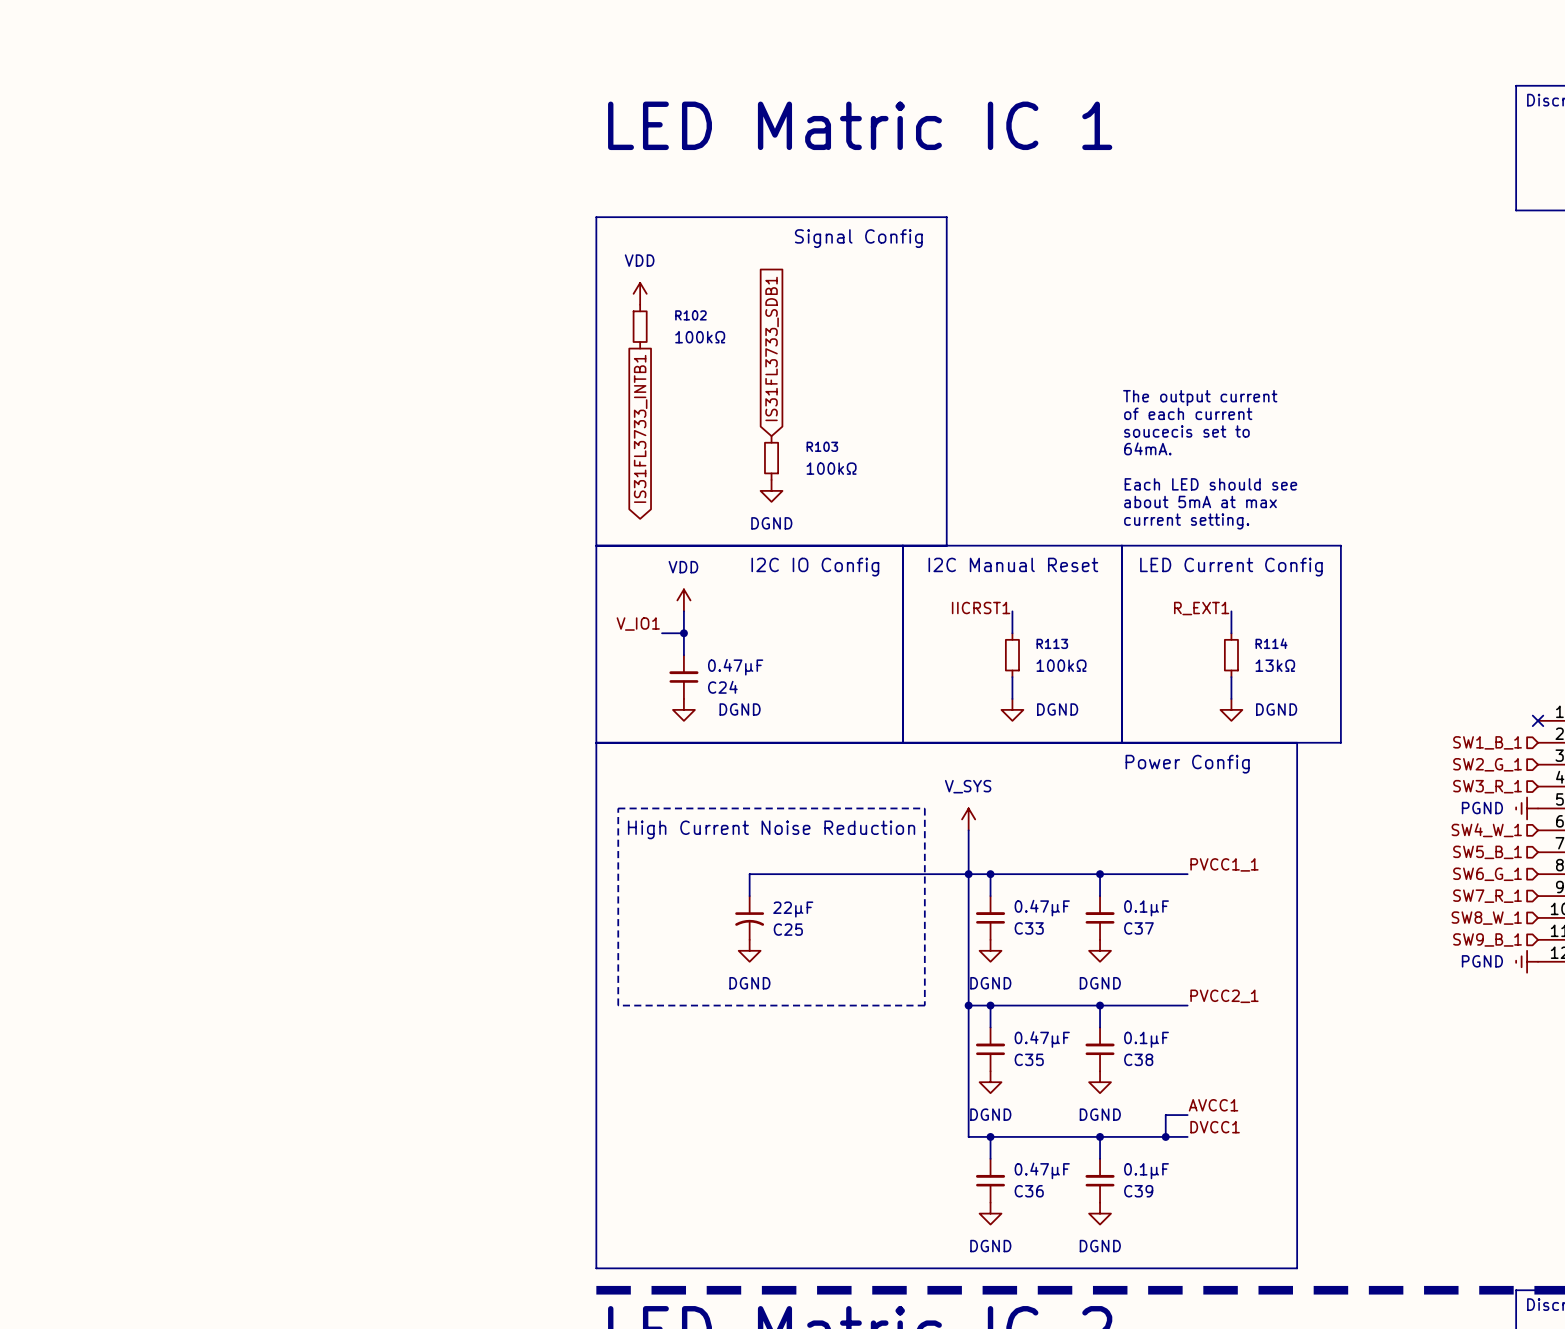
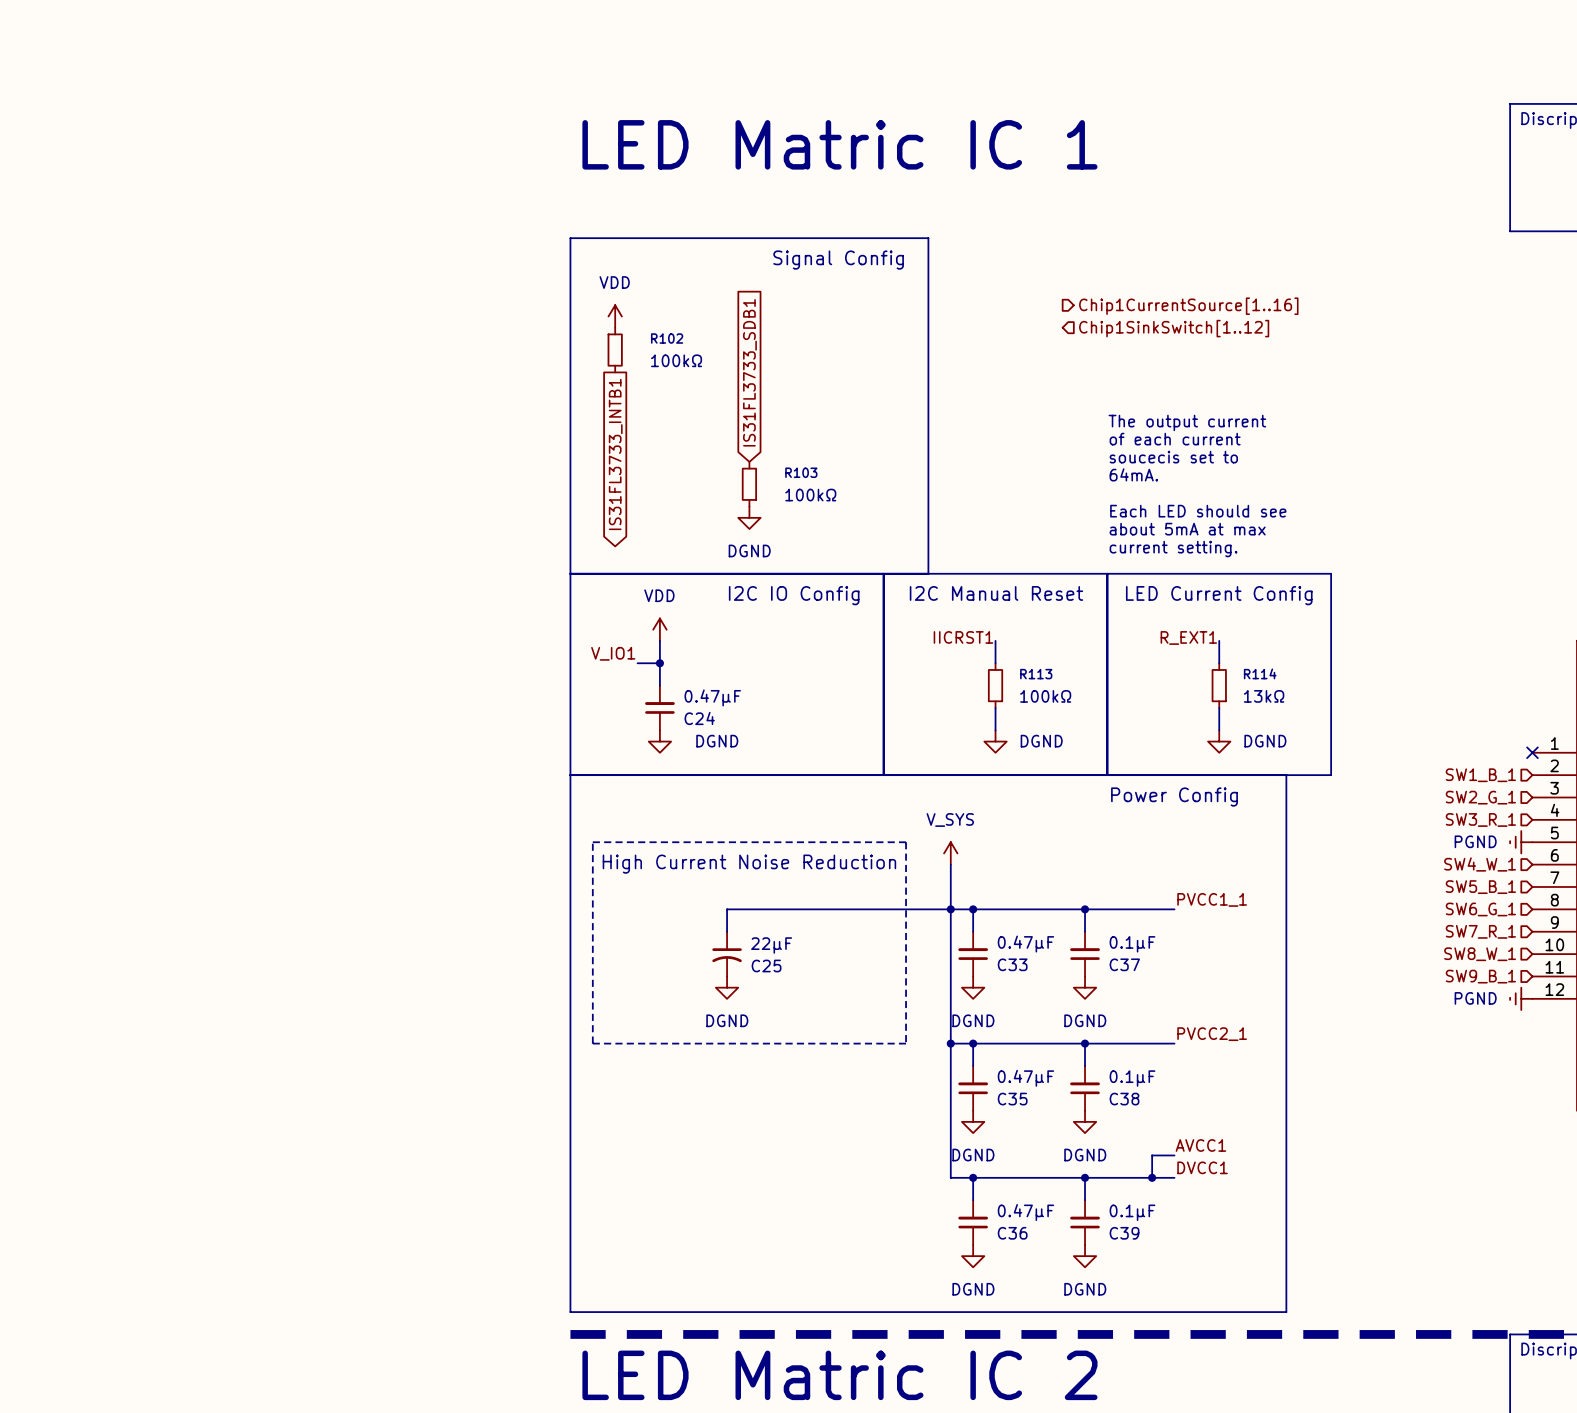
hierarchical label: none -> Chip1CurrentSource[1..16] (1188, 306)
hierarchical label: none -> Chip1SinkSwitch[1..12] (1174, 328)

